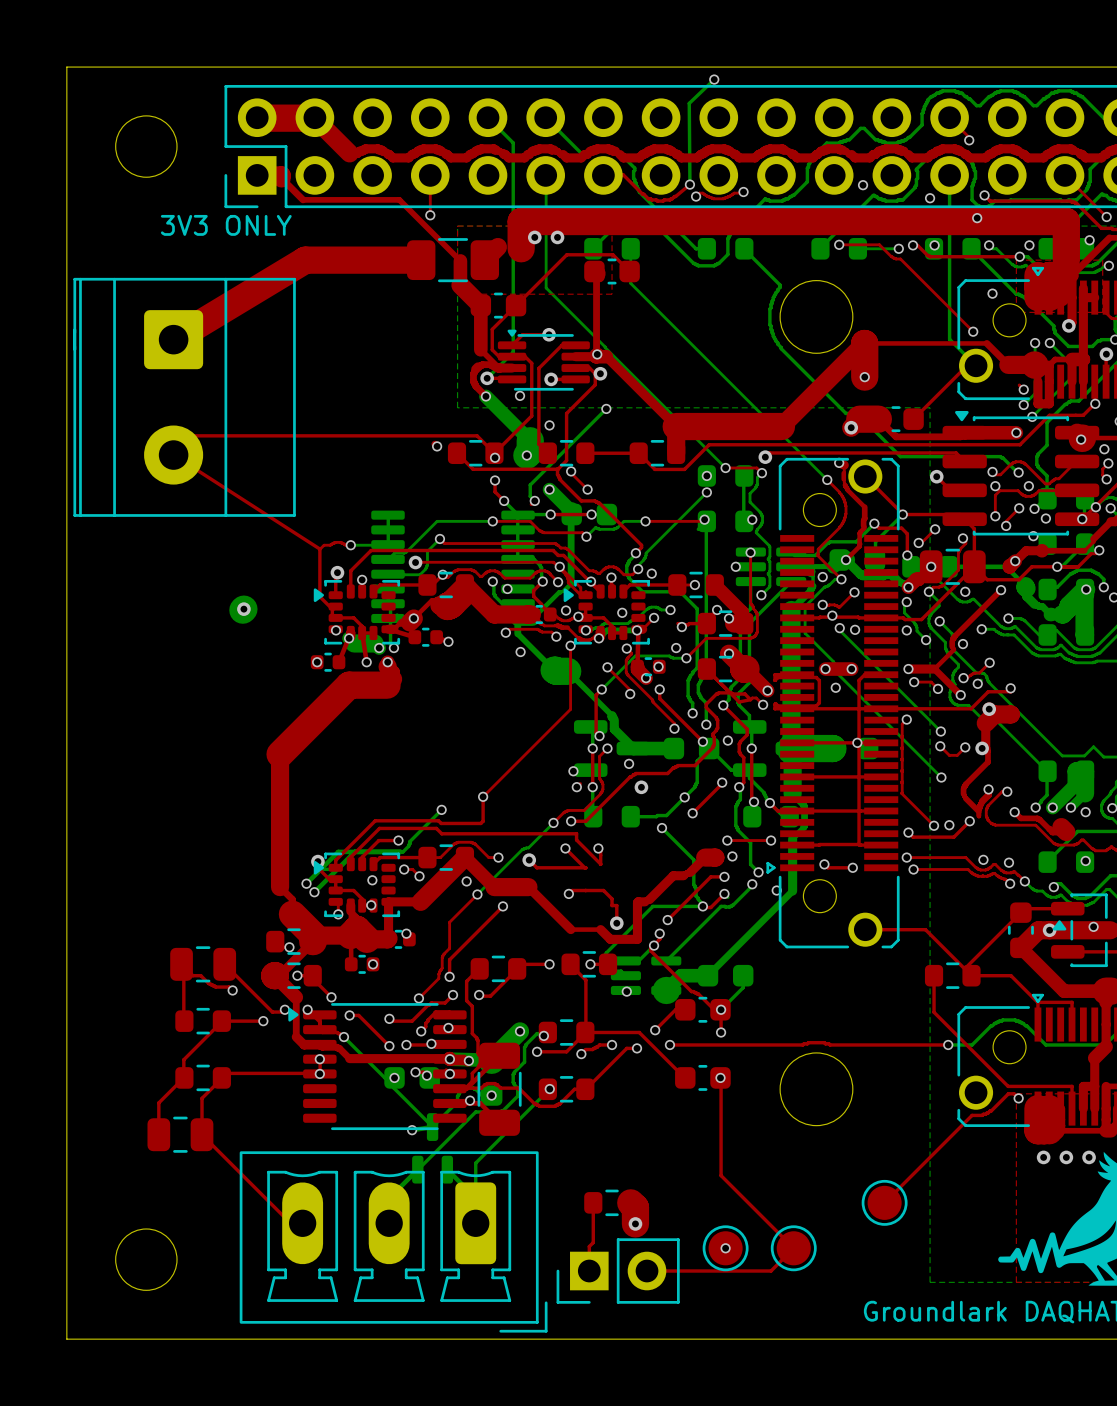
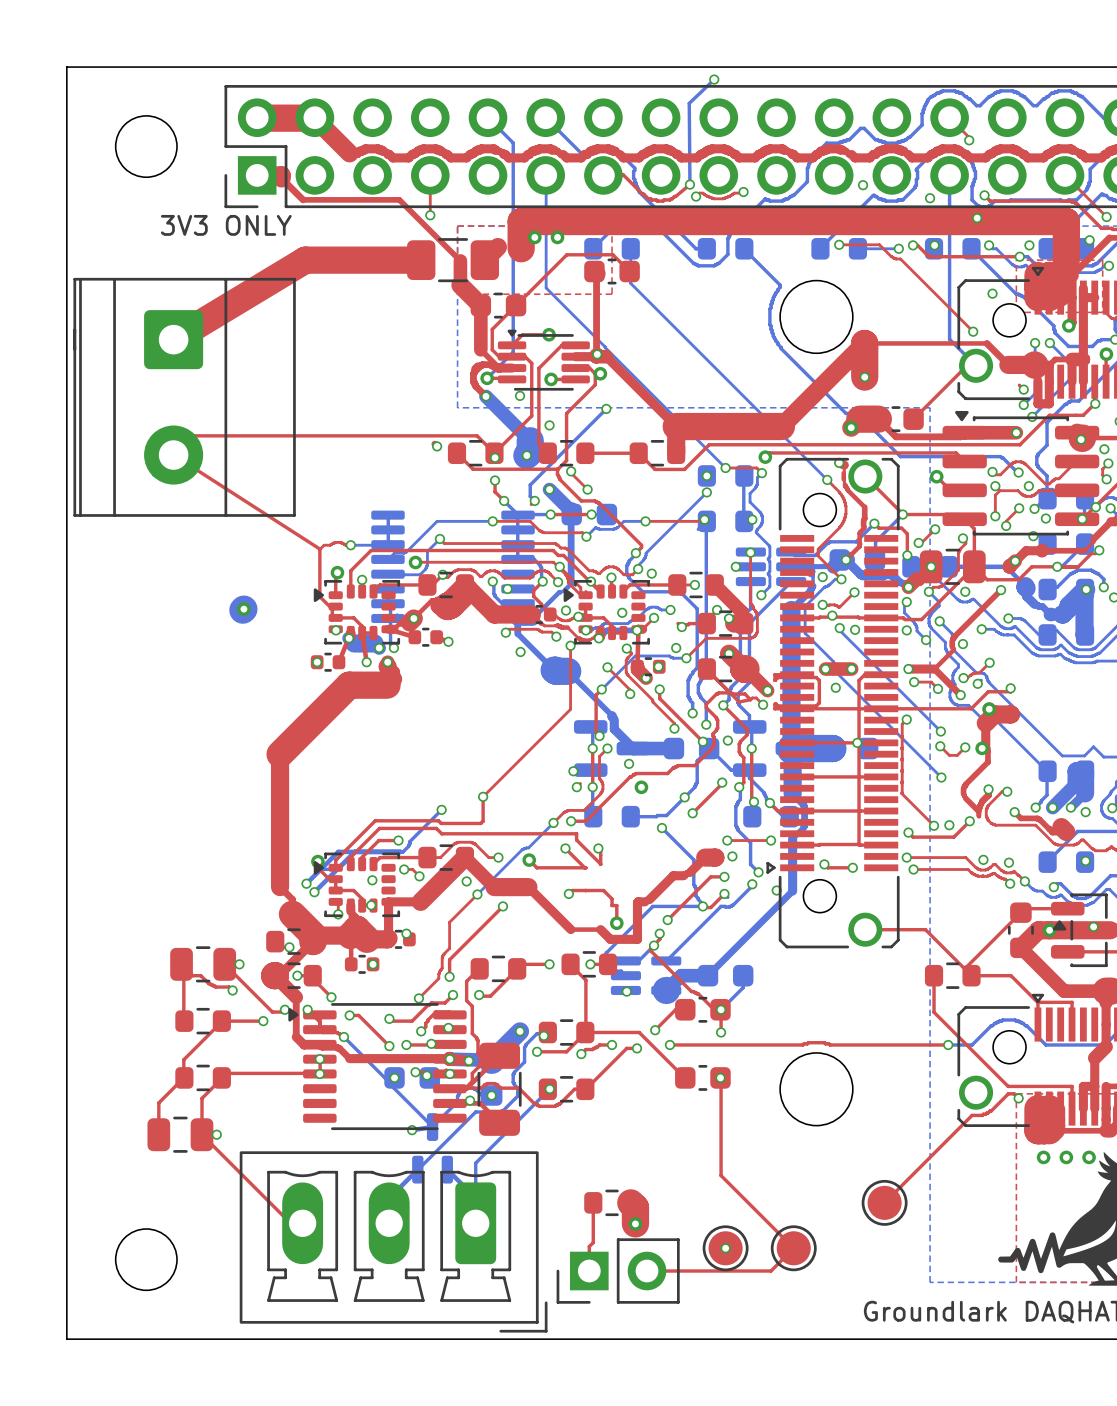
via: none -> (239, 964)
via: none -> (216, 1134)

